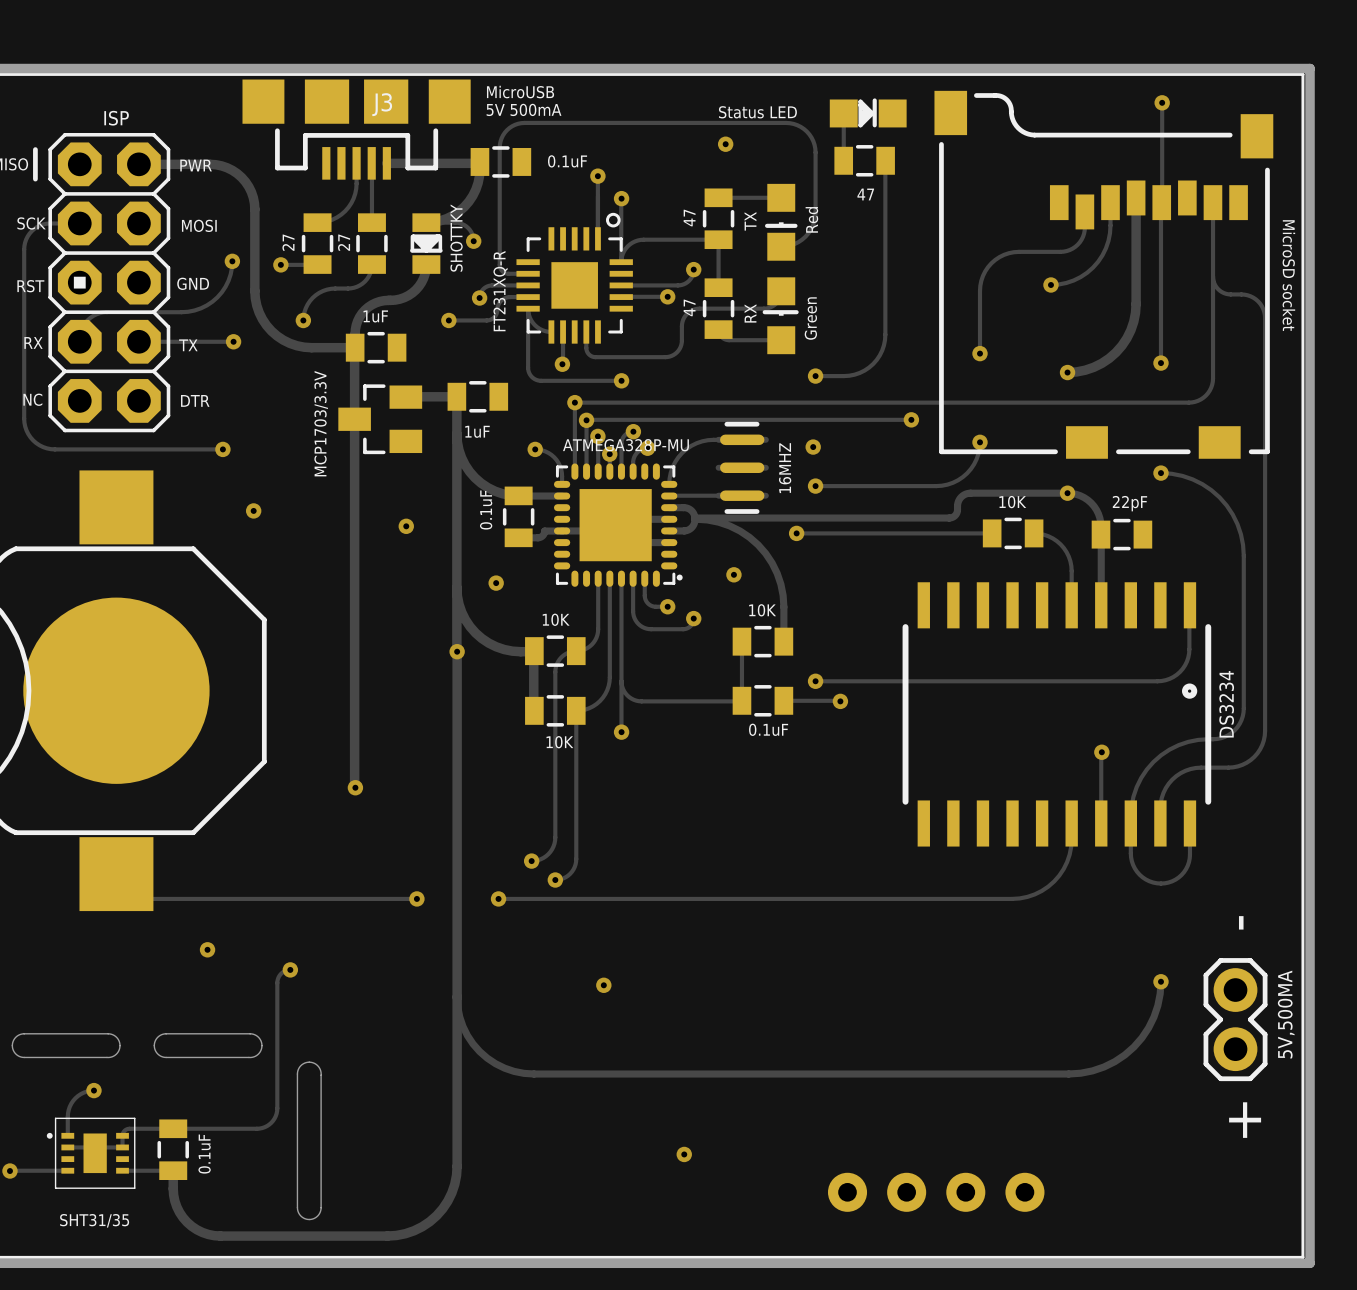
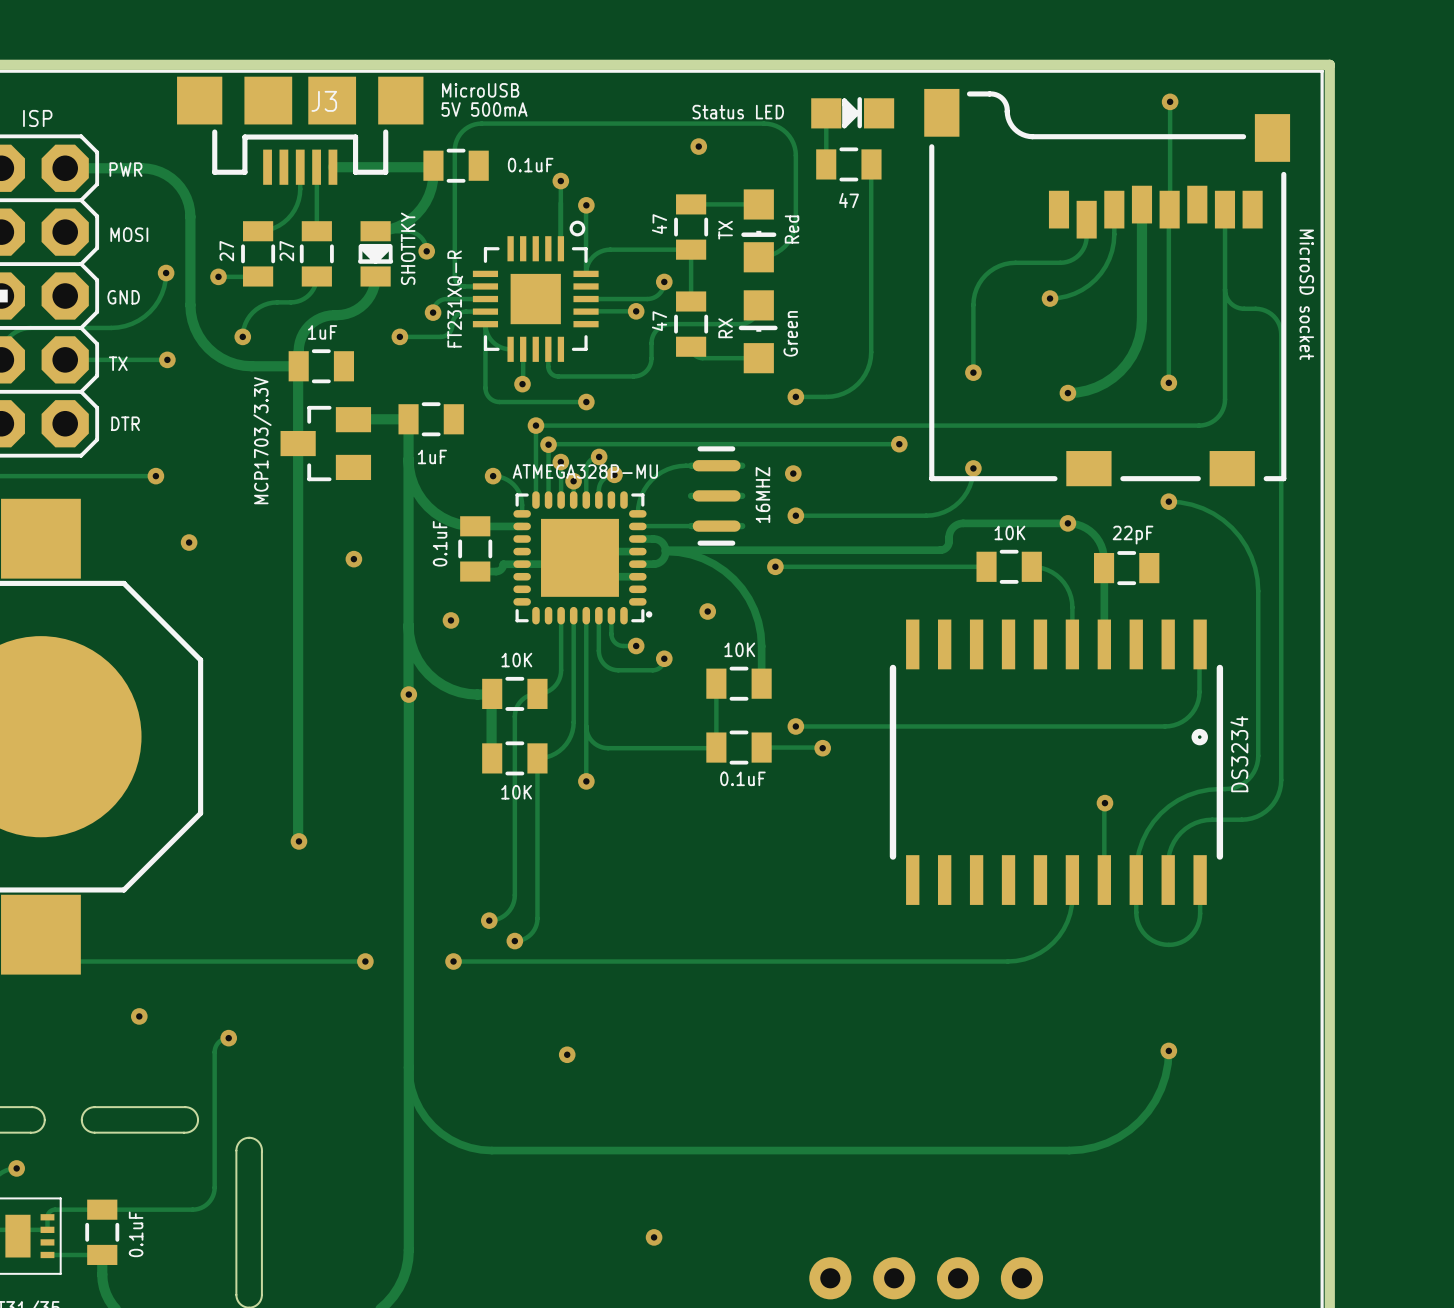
text: - (1241, 922) -> none
5V,500MA: (1235, 1019) -> none
text: + (1245, 1120) -> none

